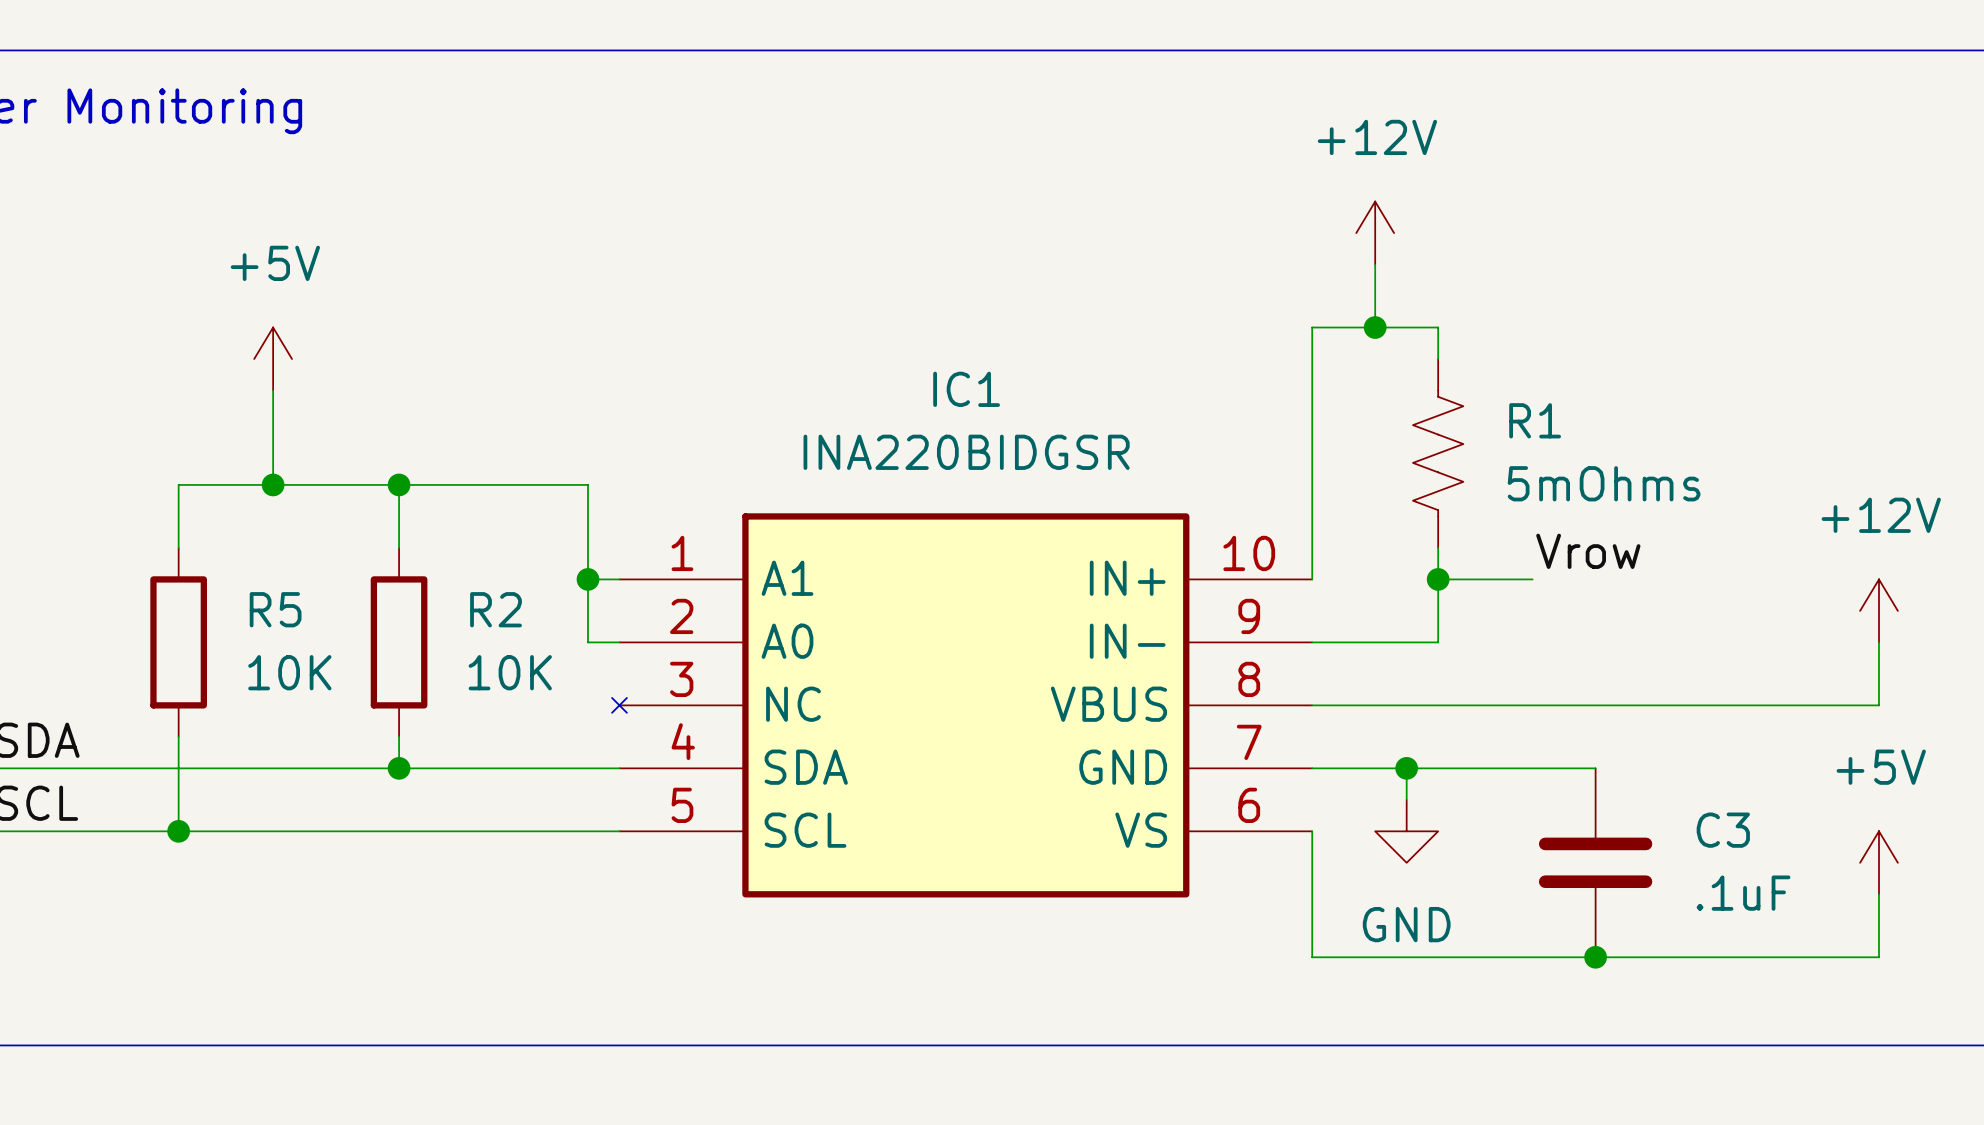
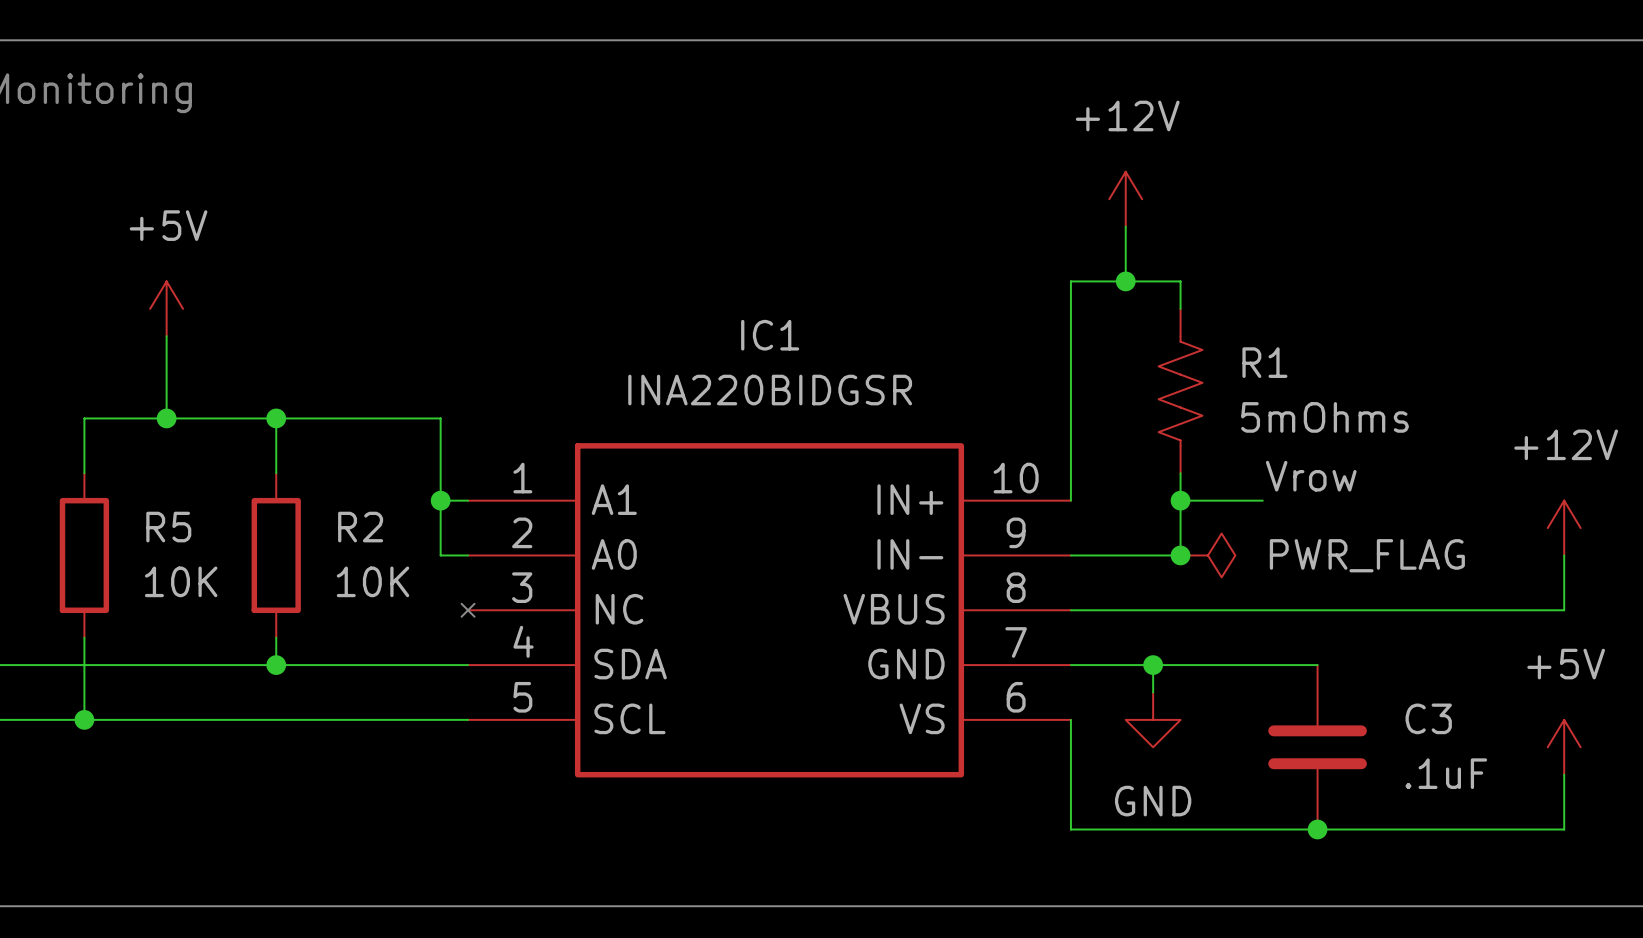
junction: none -> (1180, 555)
power symbol: none -> PWR_FLAG (1207, 555)

